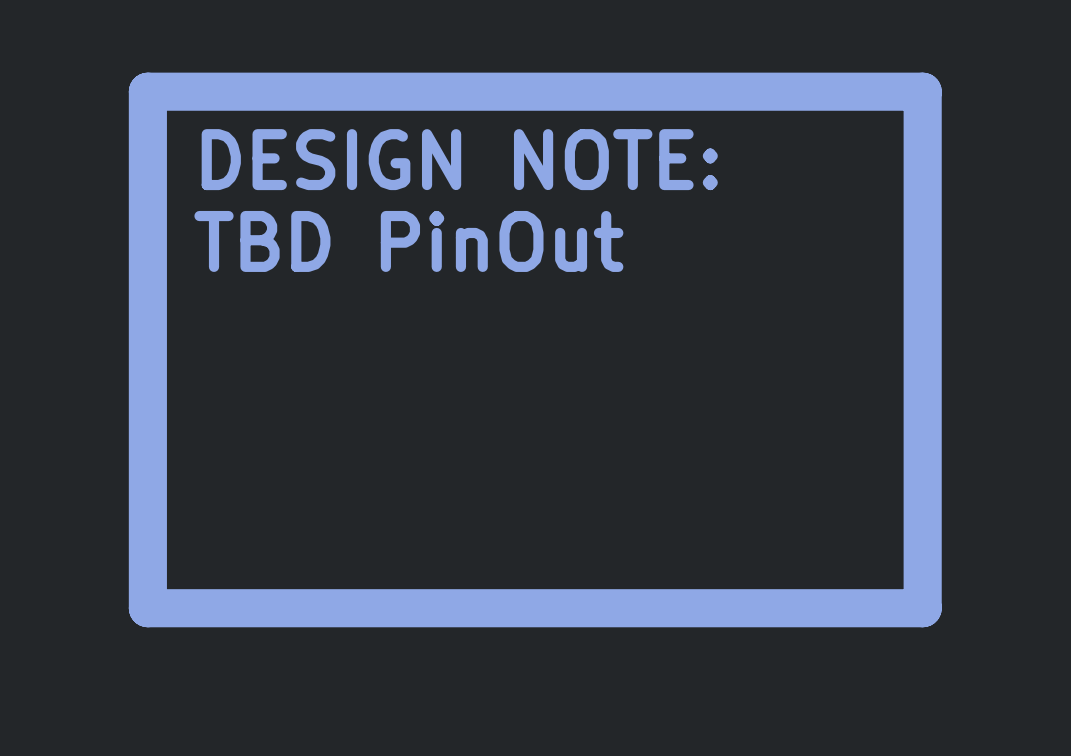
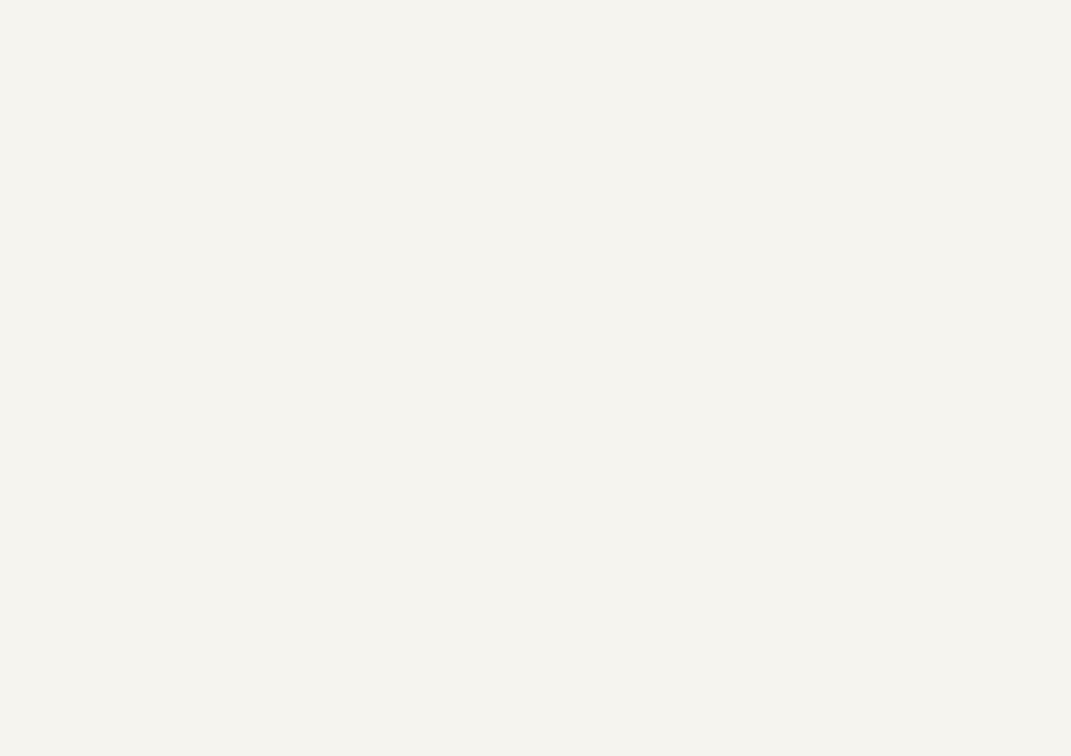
line: (147, 91) (922, 91) (922, 608) (147, 608) (147, 91) -> none
text: DESIGN NOTE: (459, 159) -> none
text: TBD PinOut (408, 241) -> none

